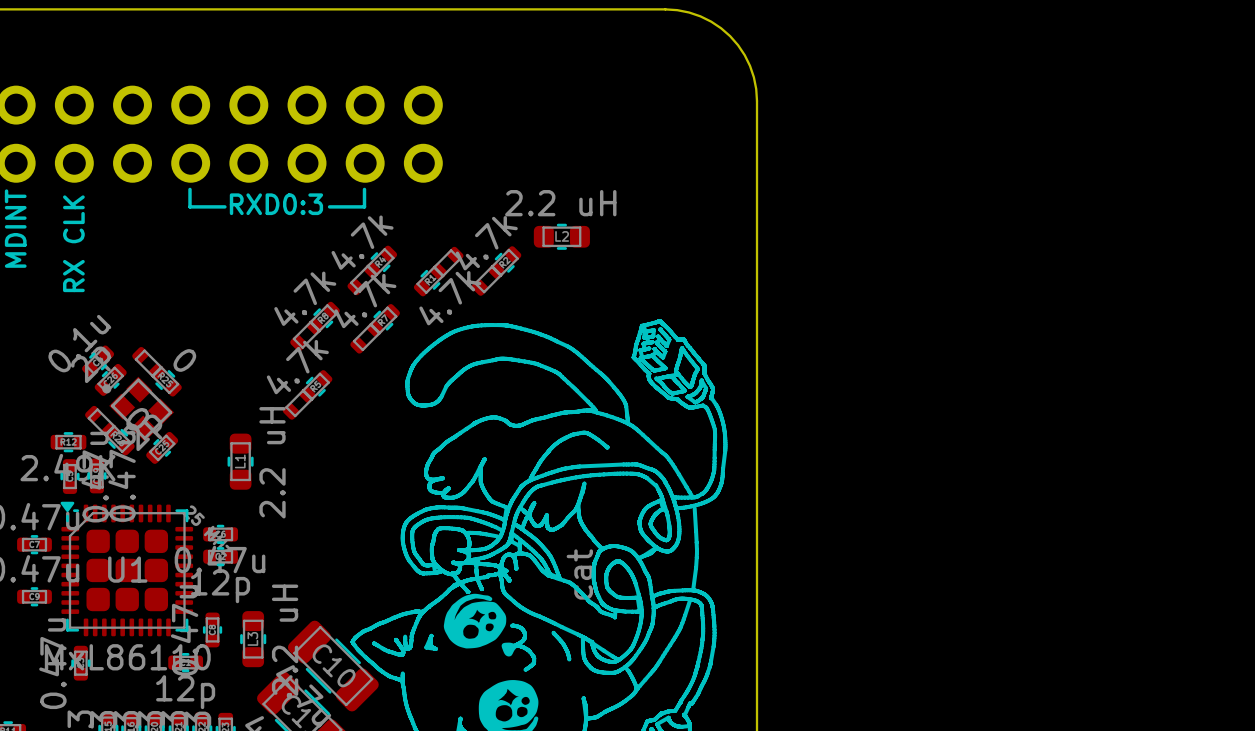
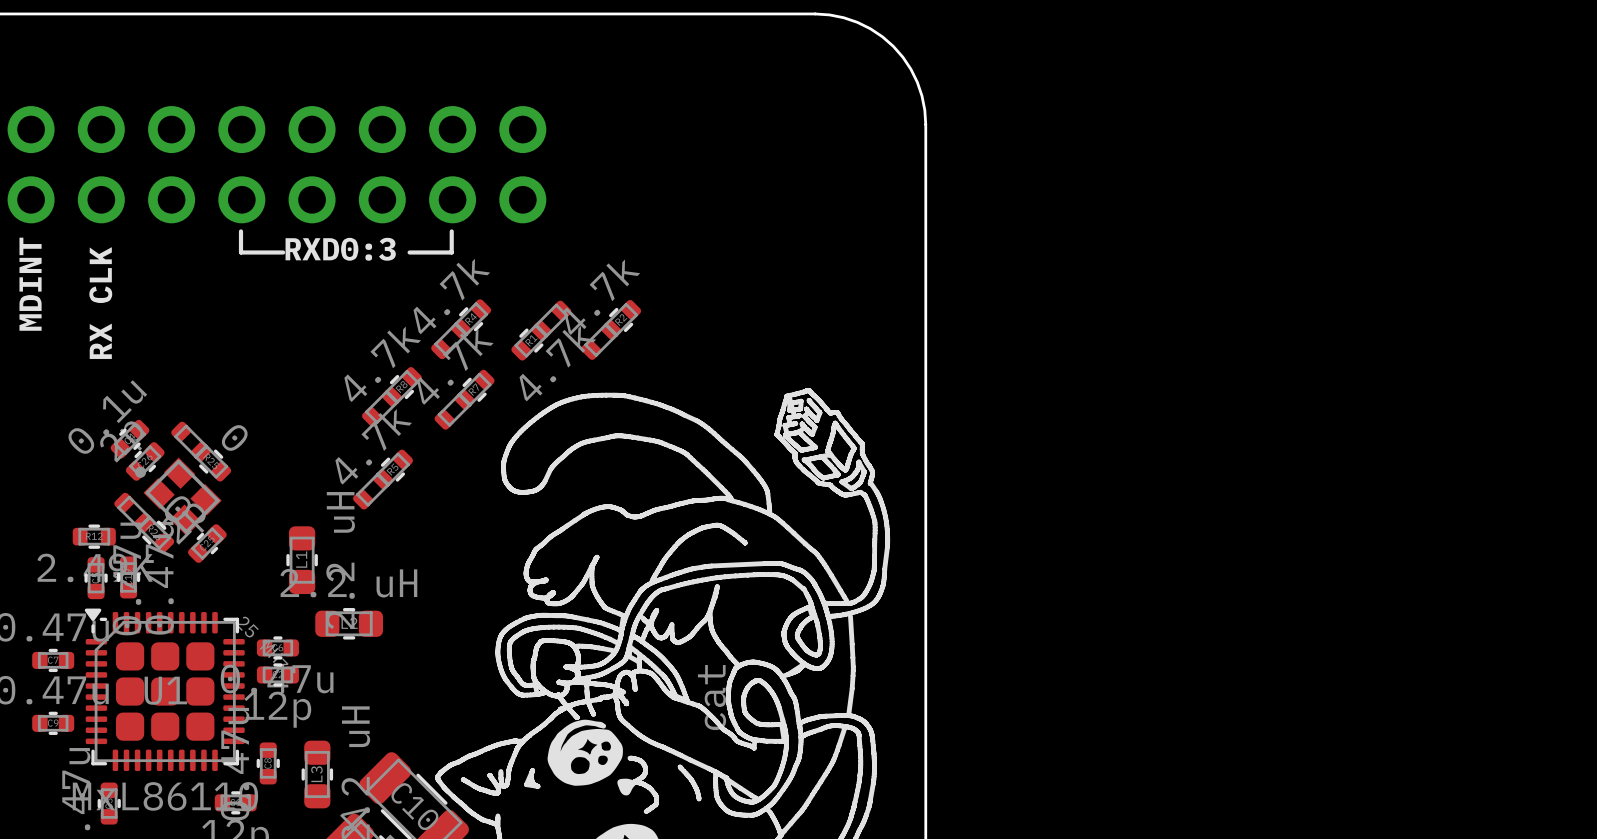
L2 position: (561, 236) -> (349, 623)

